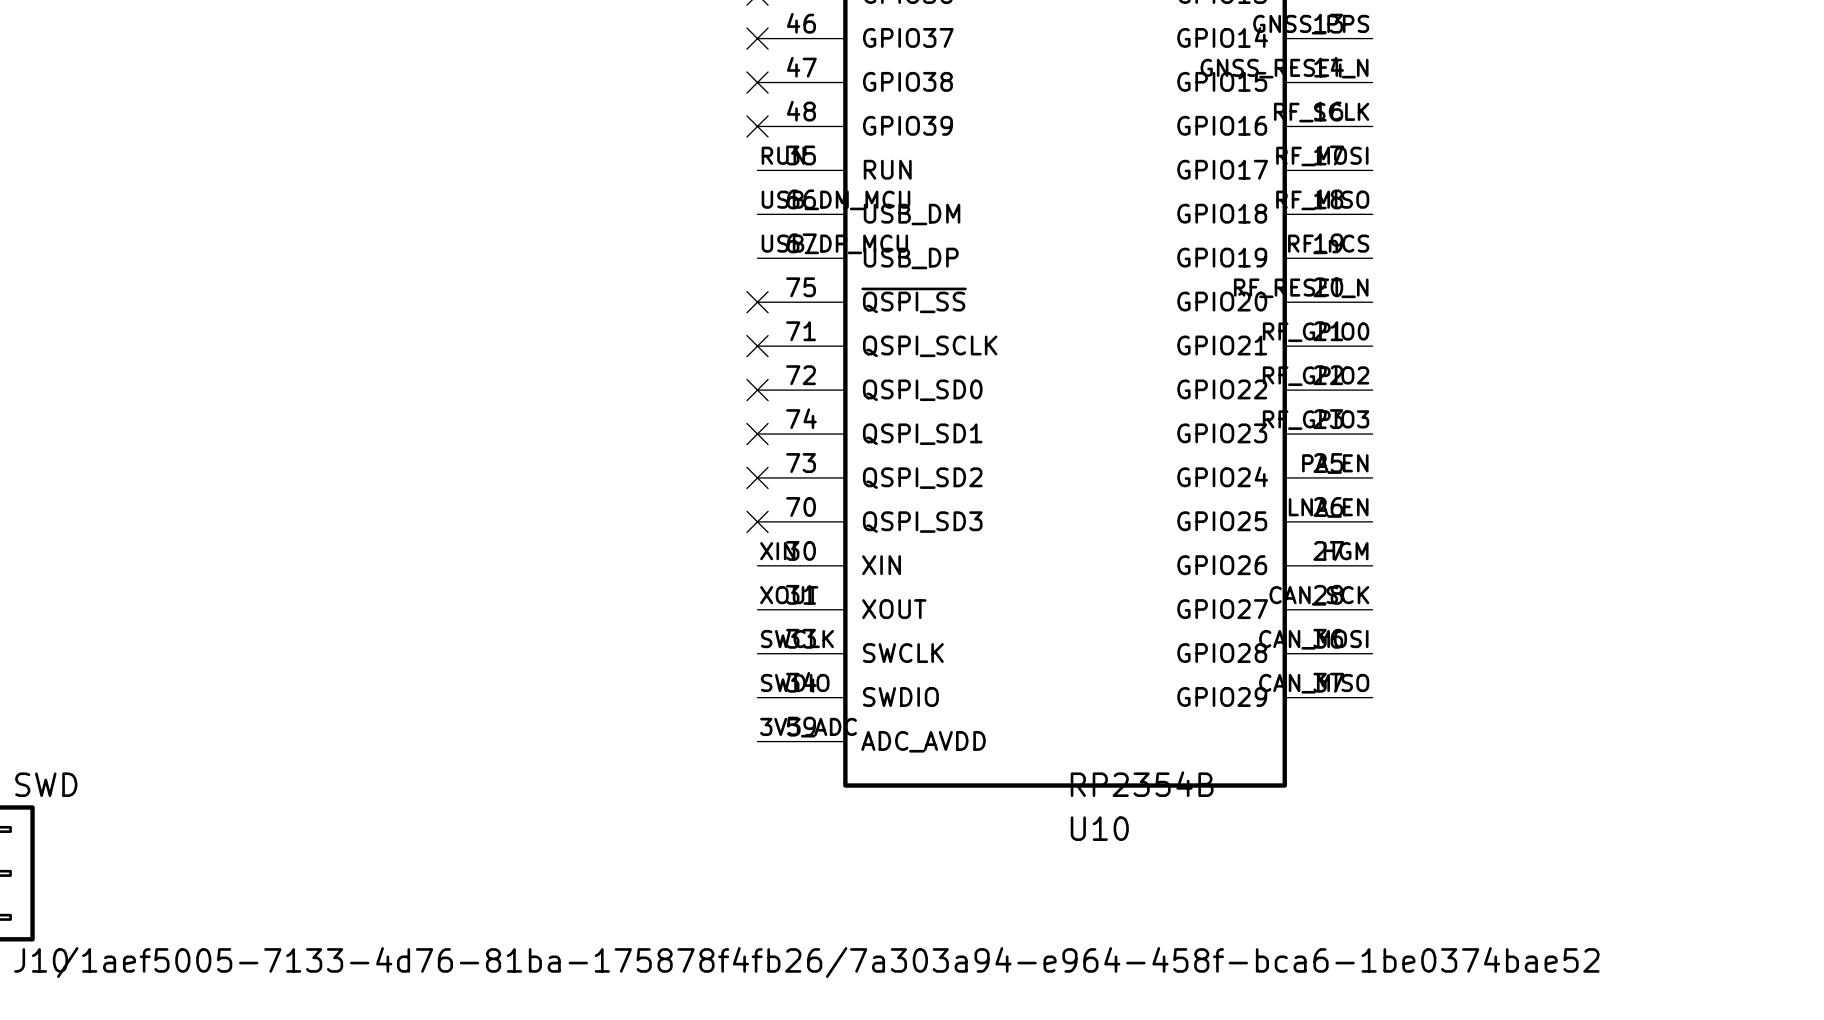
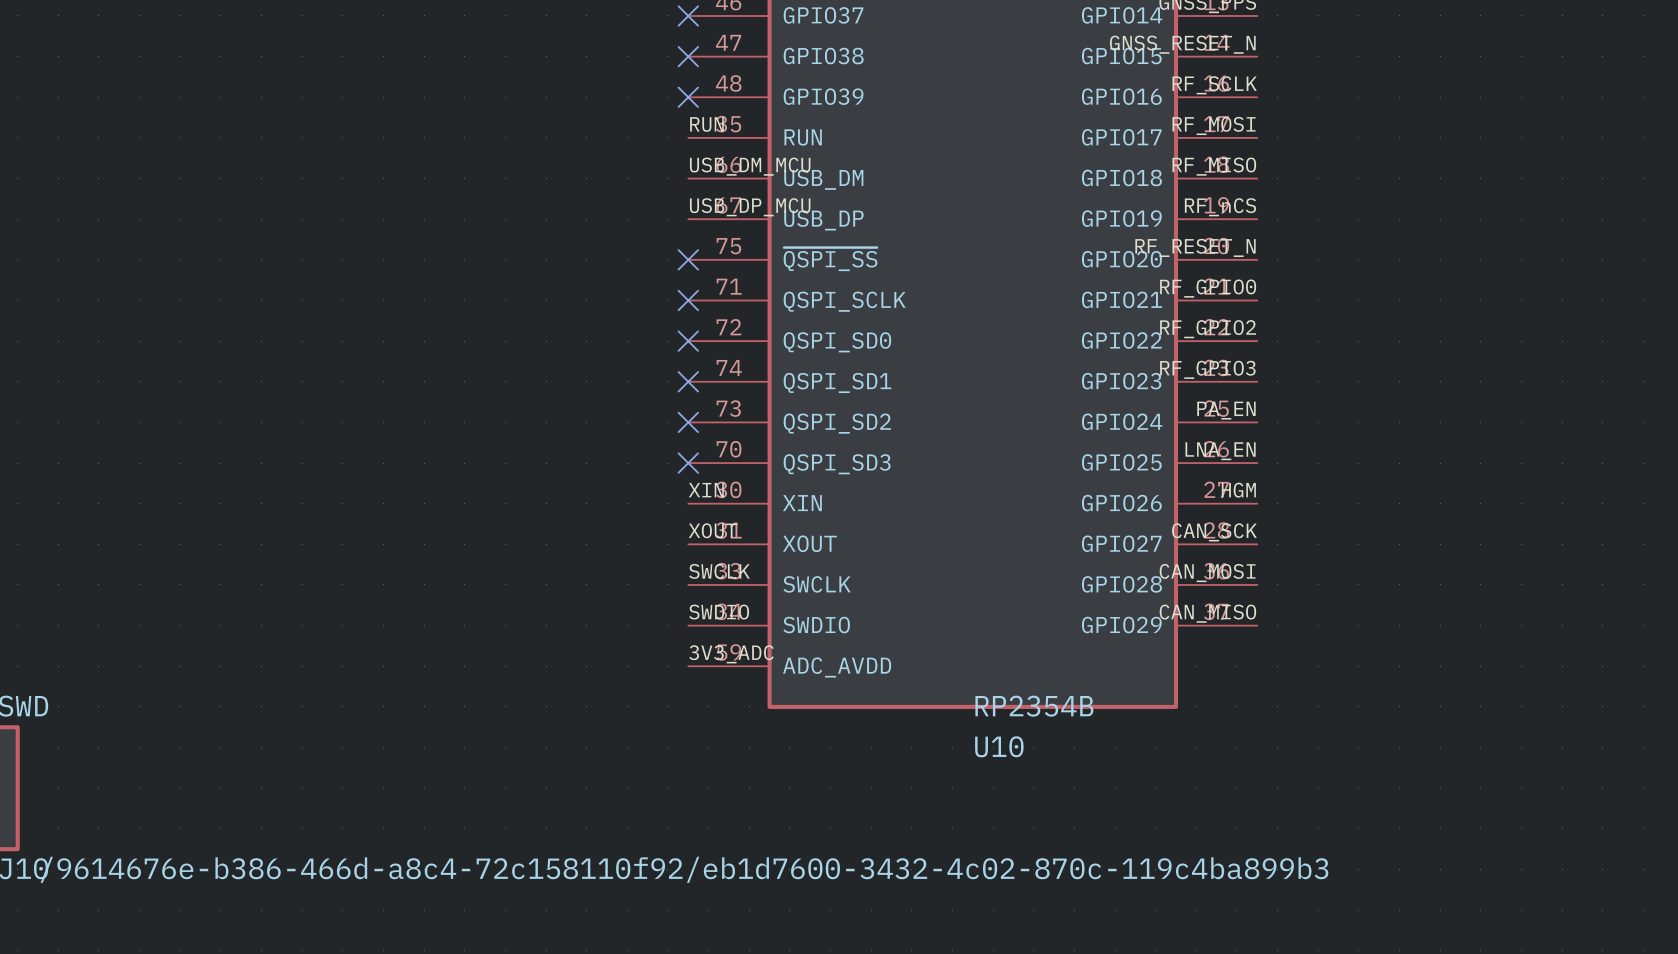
J10 text: /1aef5005-7133-4d76-81ba-175878f4fb26/7a303a94-e964-458f-bca6-1be0374bae52 (828, 962) -> /9614676e-b386-466d-a8c4-72c158110f92/eb1d7600-3432-4c02-870c-119c4ba899b3 (684, 869)

